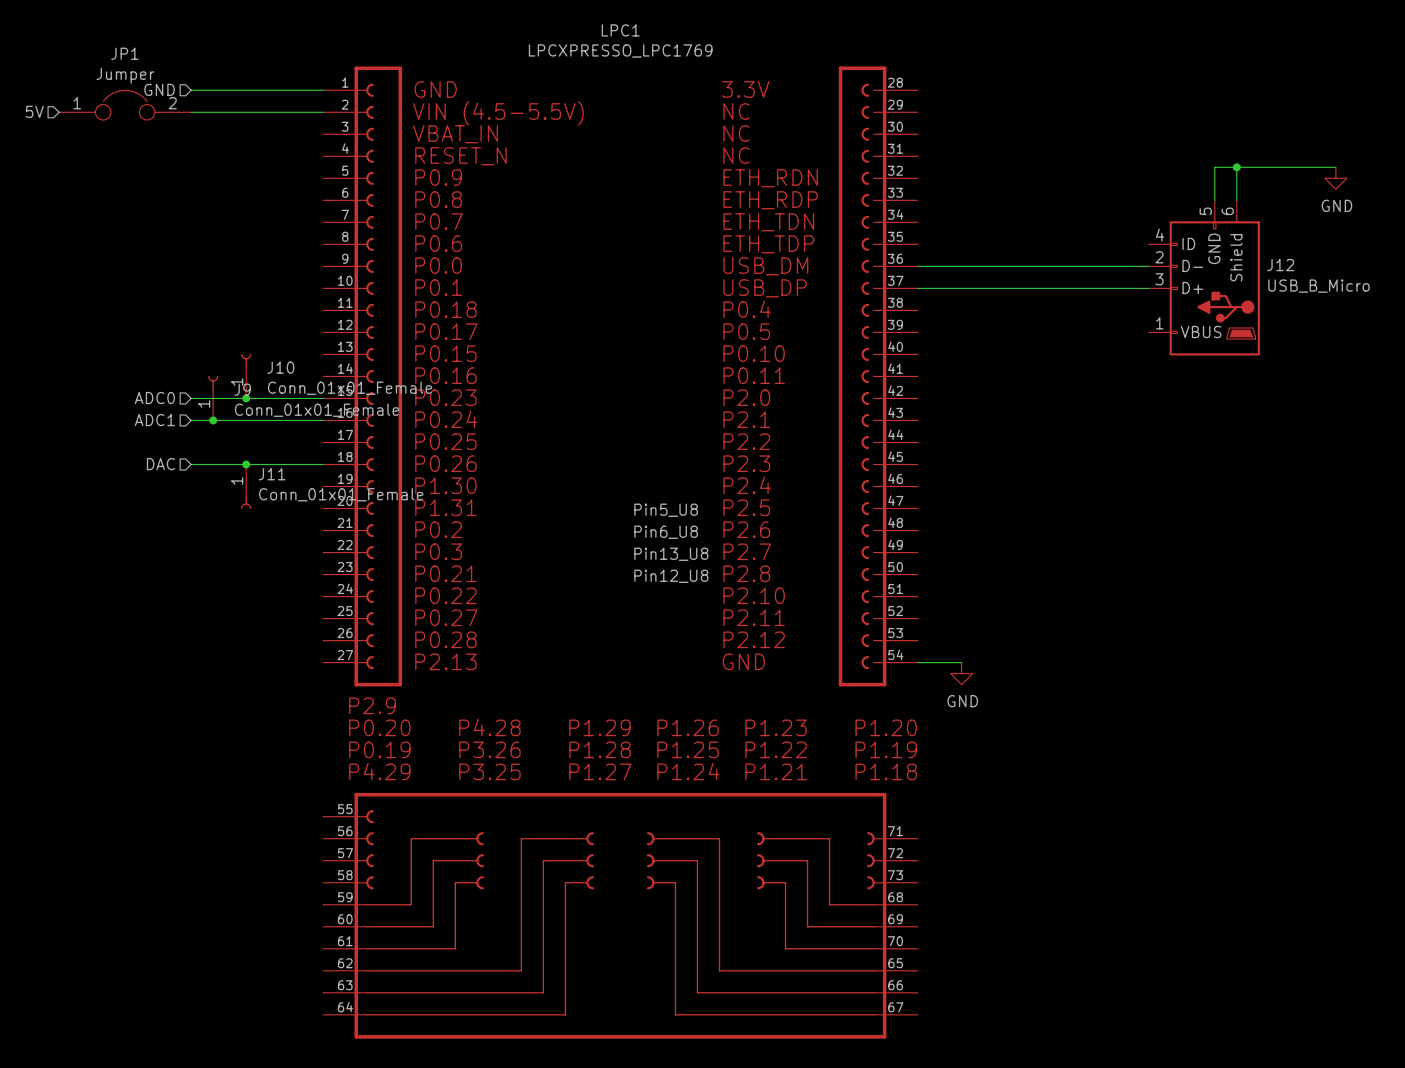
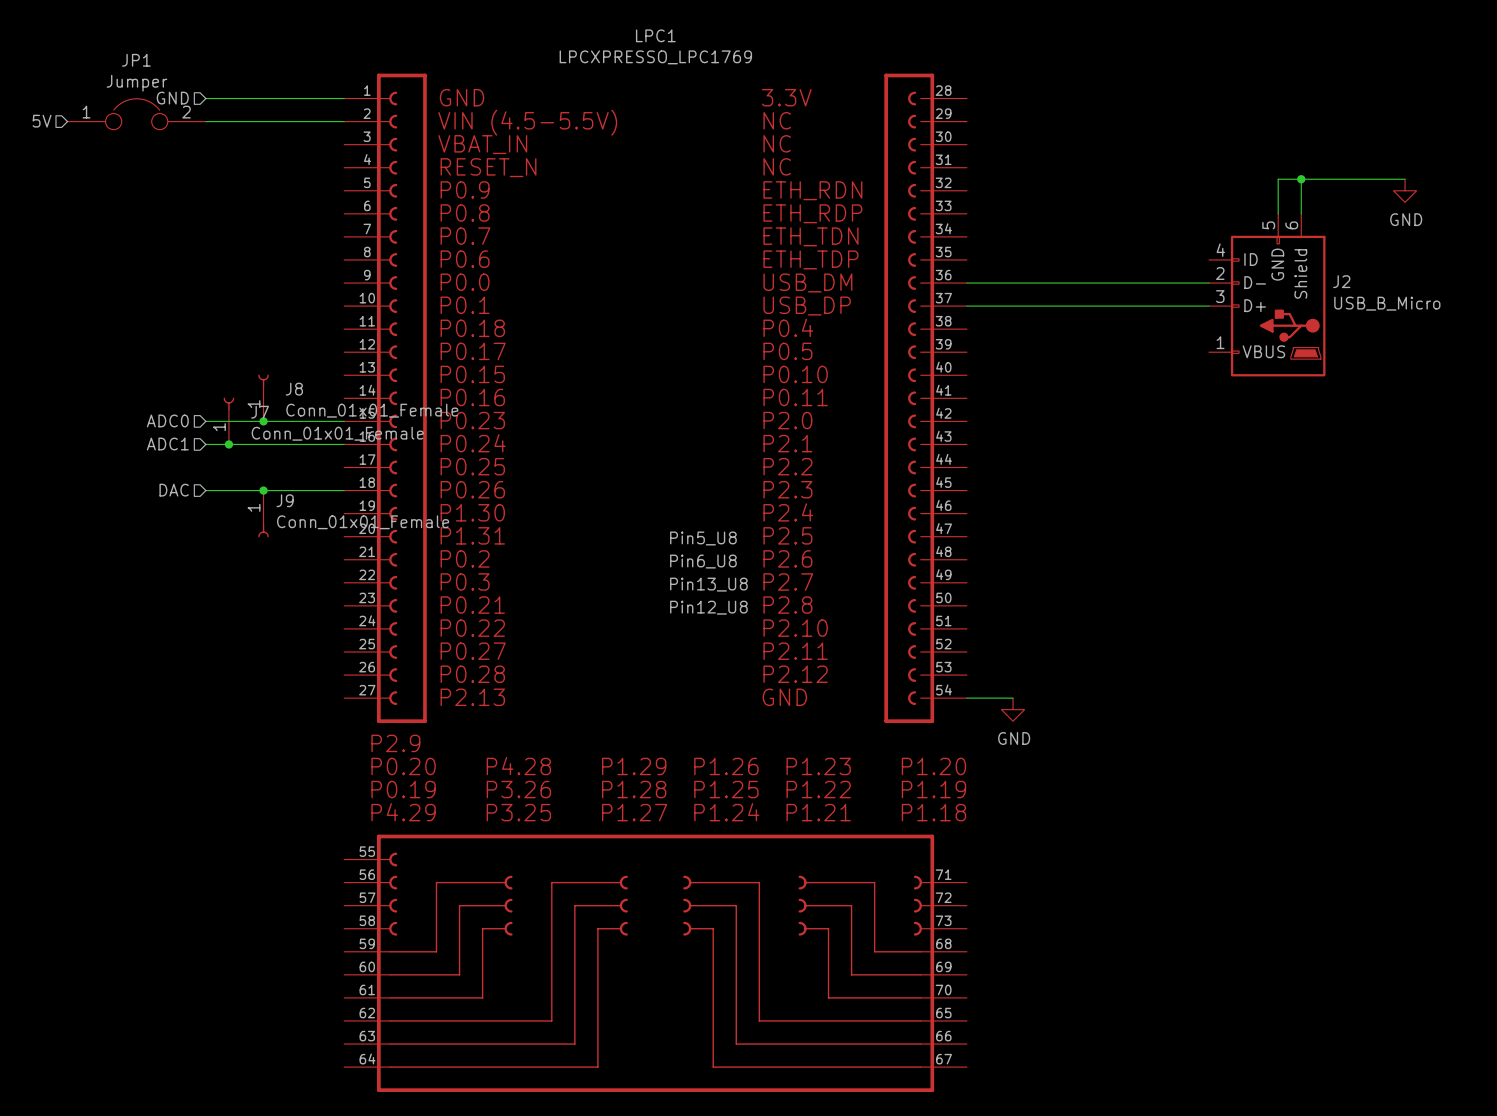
J12 name: J12 (1280, 265) -> J2 (1341, 281)
J10 name: J10 (280, 367) -> J8 (294, 389)
J9 name: J9 (242, 389) -> J7 (260, 412)
J11 name: J11 (272, 474) -> J9 (285, 500)

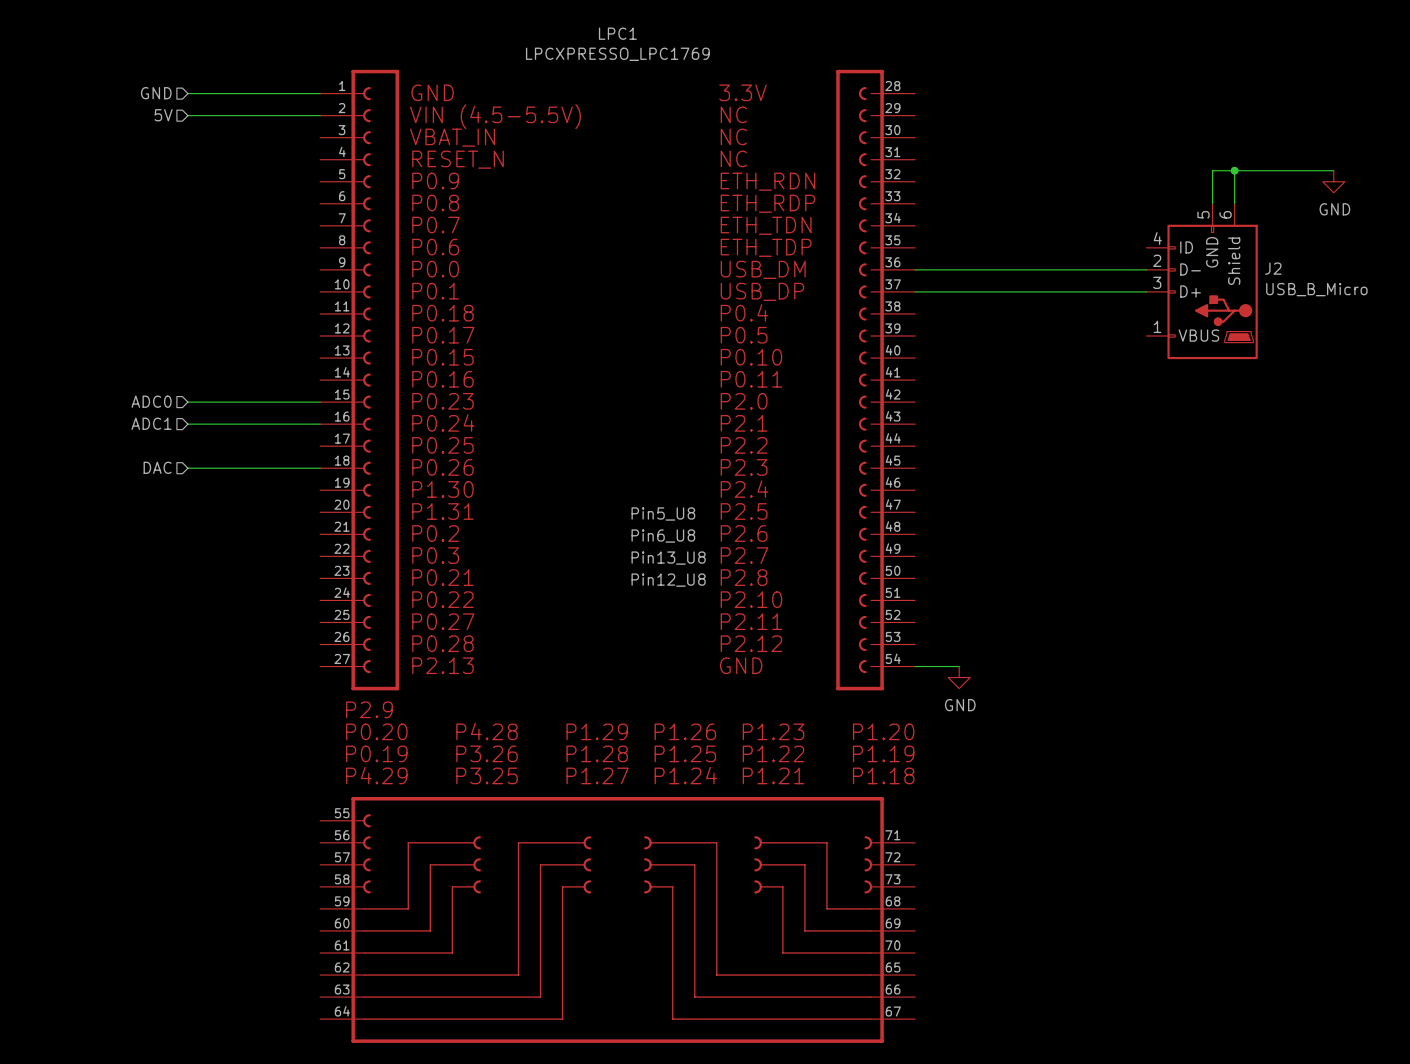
JP1: Jumper (136, 114) -> none
hierarchical label position: 5V (42, 121) -> 5V (163, 115)
J8: Conn_01x01_Female (263, 397) -> none
J7: Conn_01x01_Female (228, 421) -> none
junction: (263, 421) -> none
junction: (228, 444) -> none
junction: (263, 490) -> none
J9: Conn_01x01_Female (263, 513) -> none

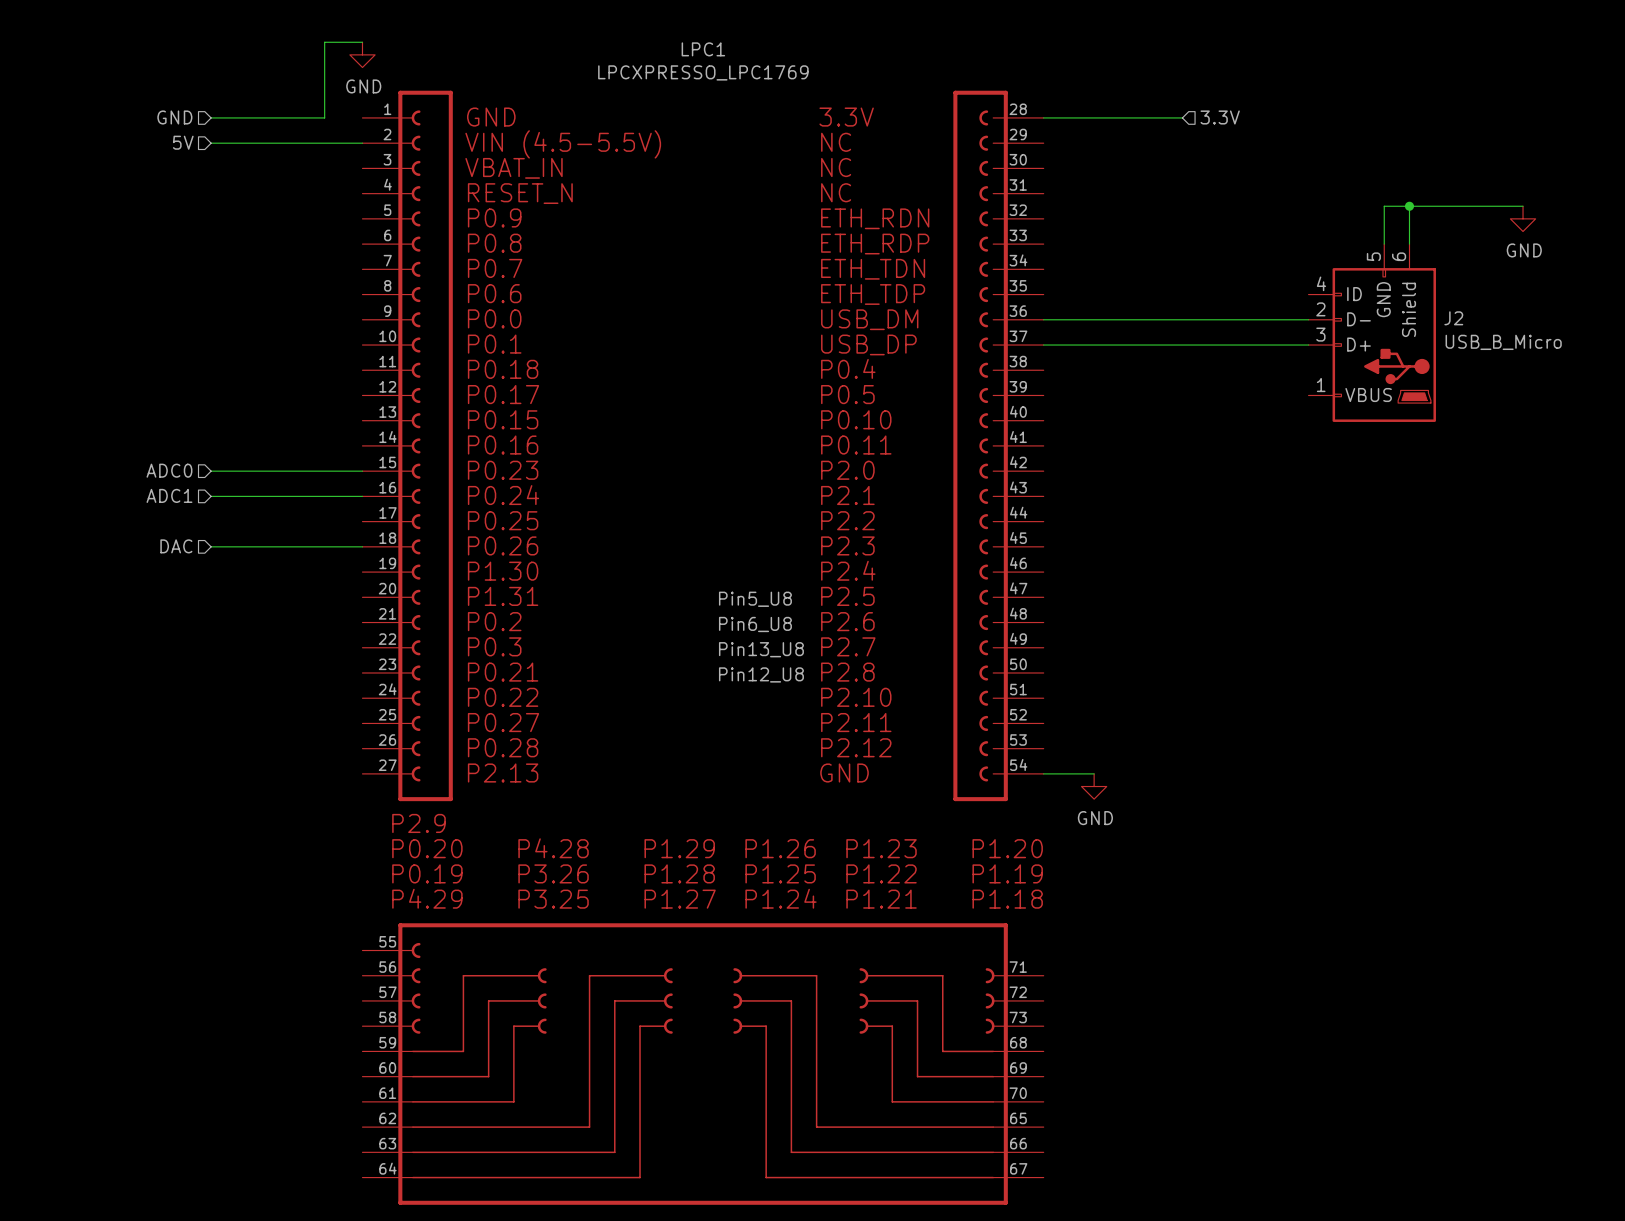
power symbol: none -> GND (362, 54)
wire: (287, 93) (320, 93) -> (324, 117) (324, 42) (362, 42)
wire: none -> (1043, 117) (1182, 117)
hierarchical label: none -> 3.3V (1220, 117)

